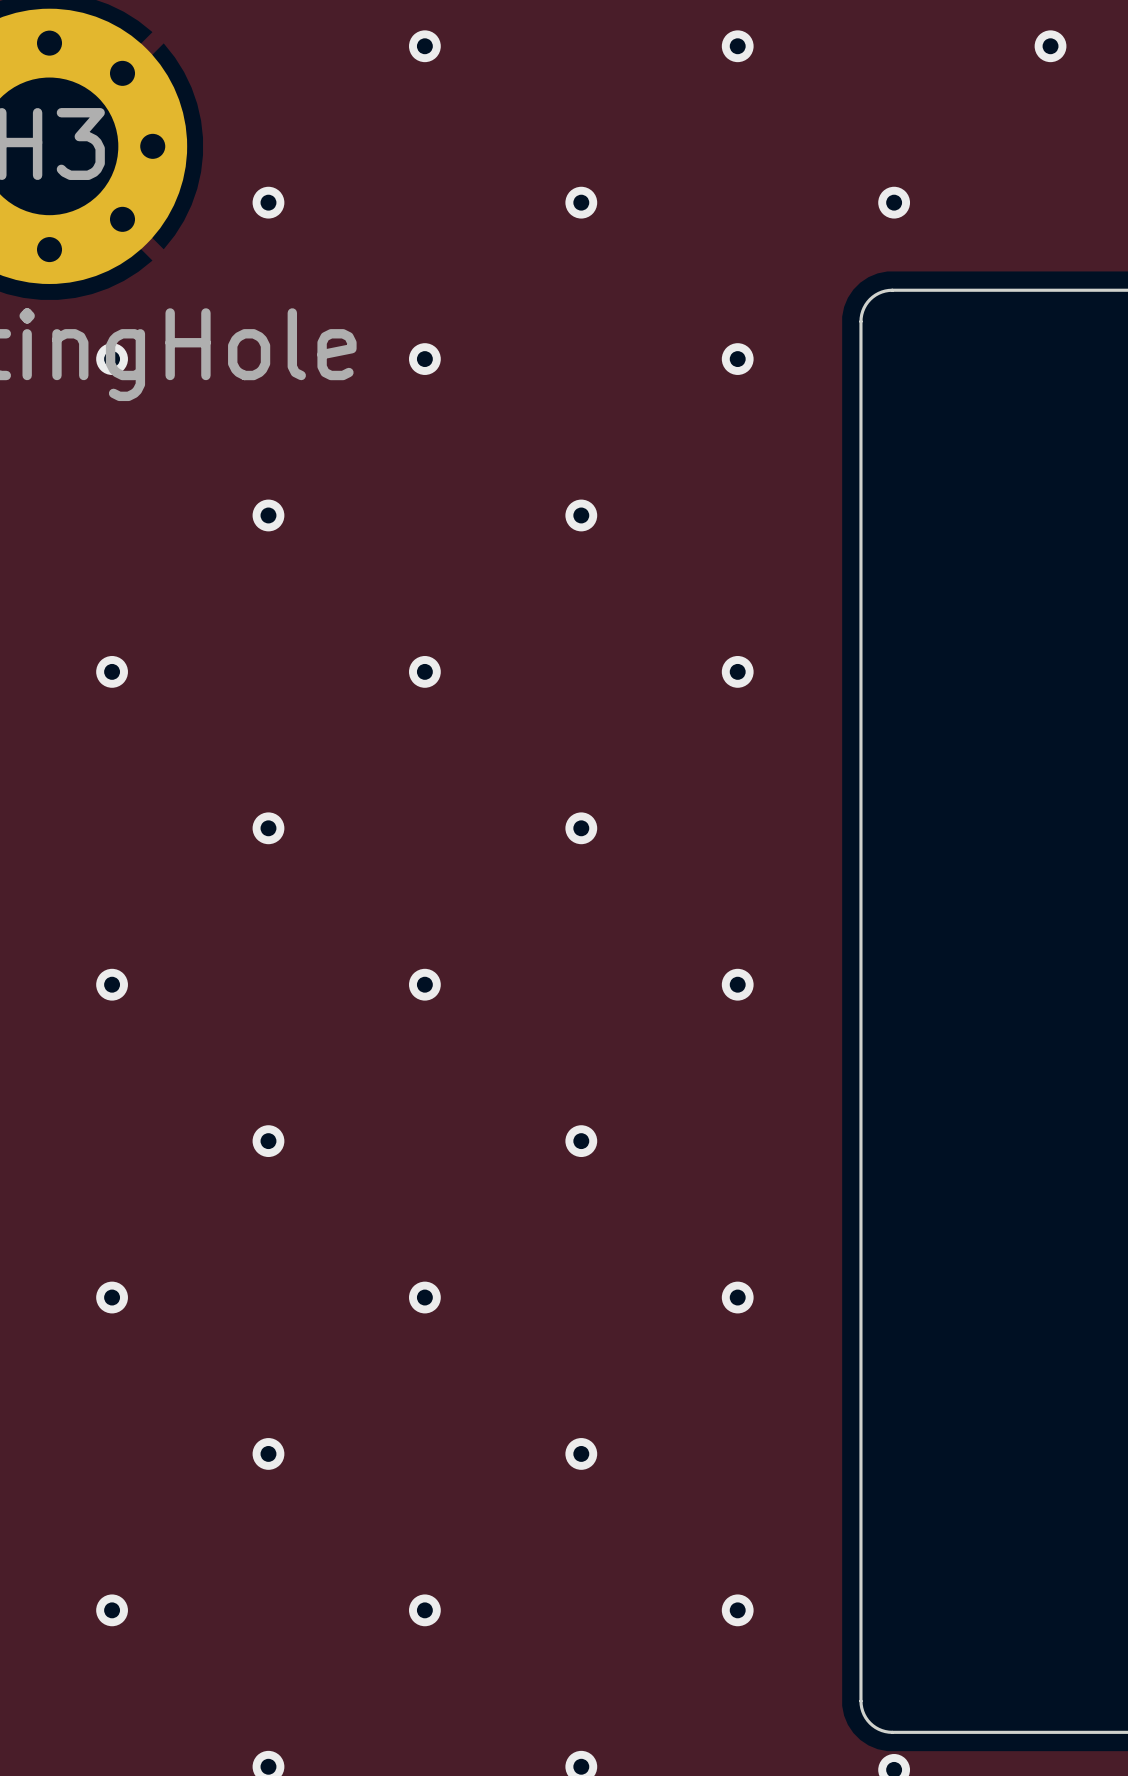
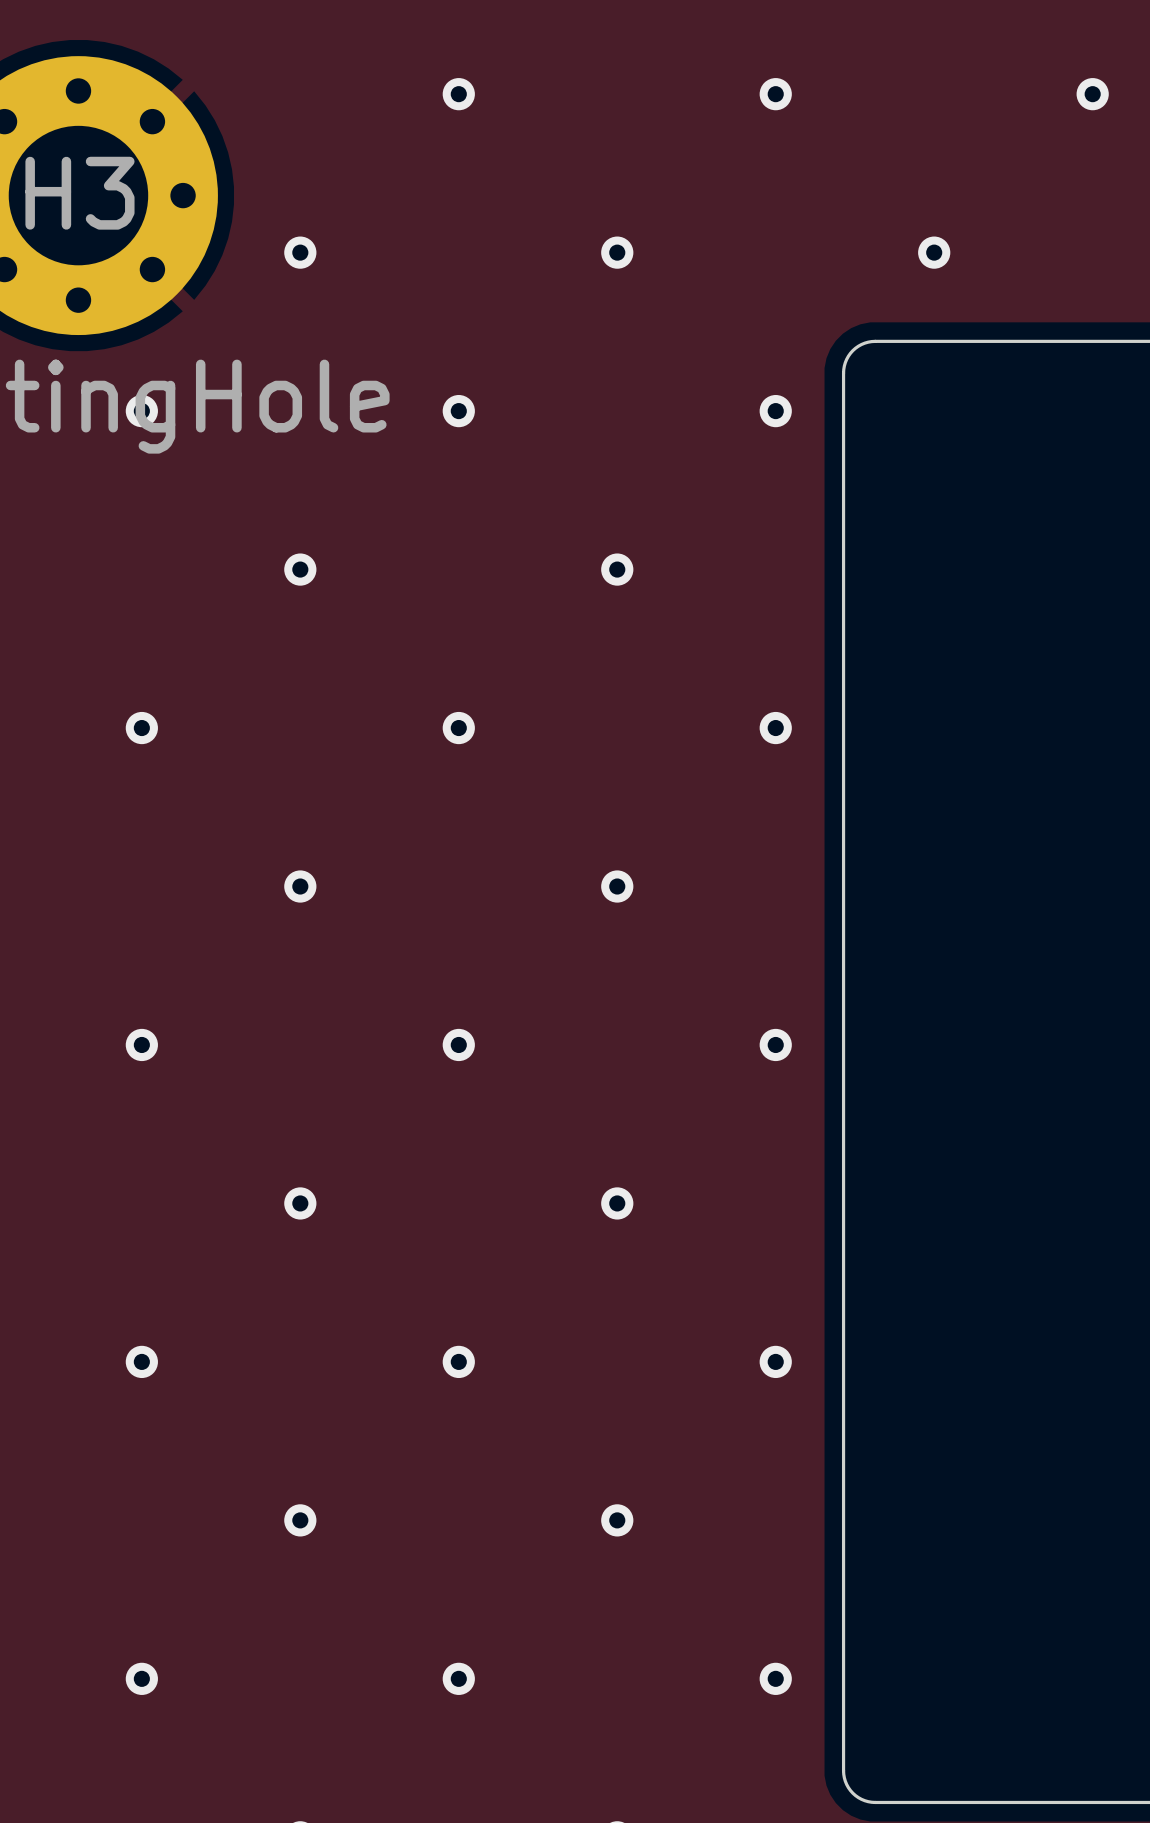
board edge: (892, 290) (881, 292) (870, 299) (864, 307) (860, 321) (860, 1701) (864, 1714) (870, 1723) (881, 1730) (892, 1732) -> (932, 341) (875, 341) (864, 343) (855, 348) (848, 356) (843, 373) (843, 1774) (850, 1790) (864, 1800) (875, 1802) (932, 1802)

